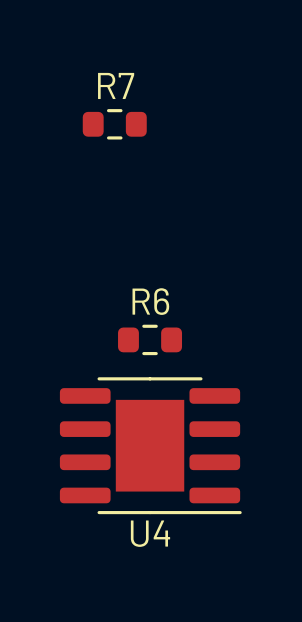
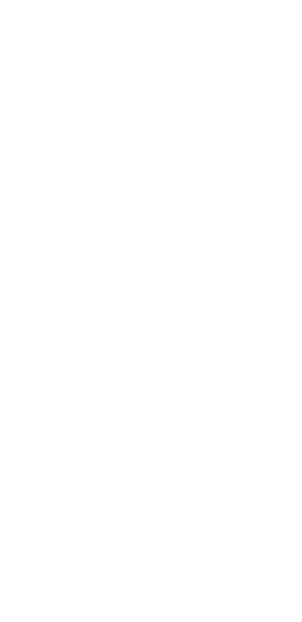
R7: (114, 124) -> none
R6: (150, 339) -> none
U4: (150, 445) -> none

